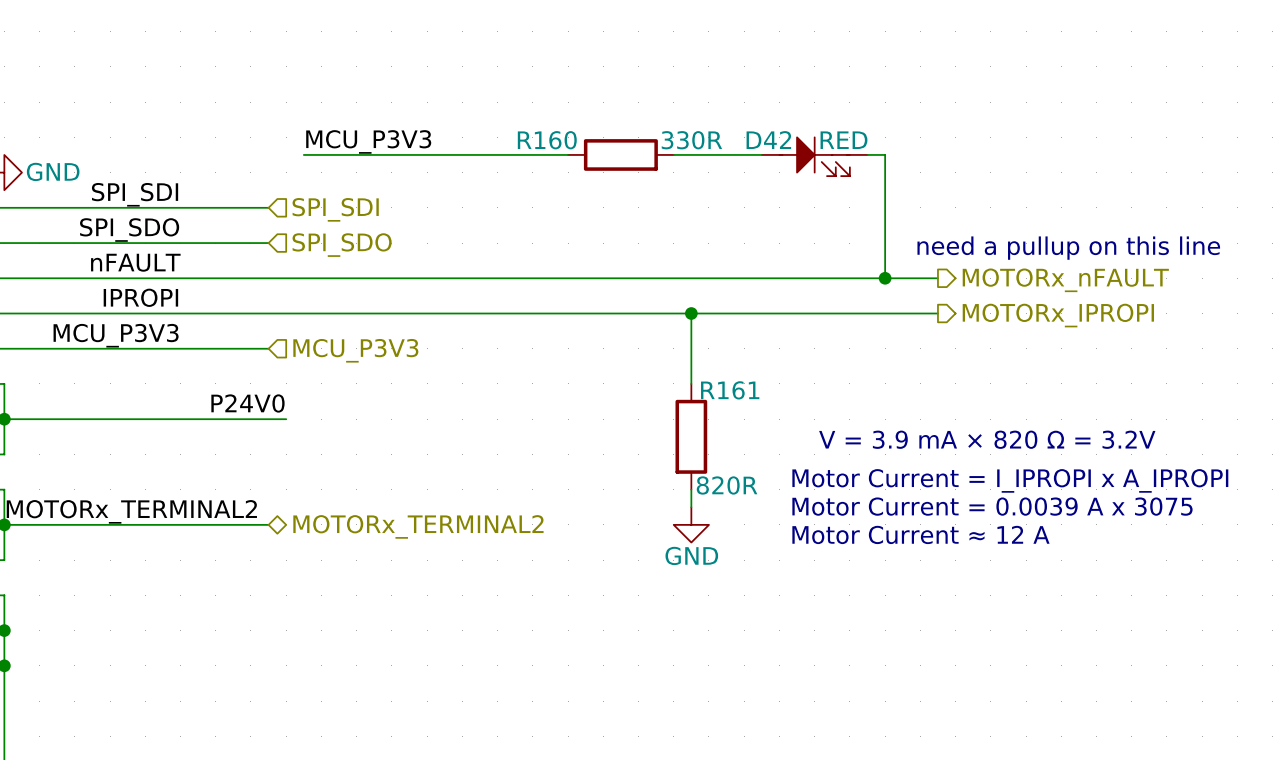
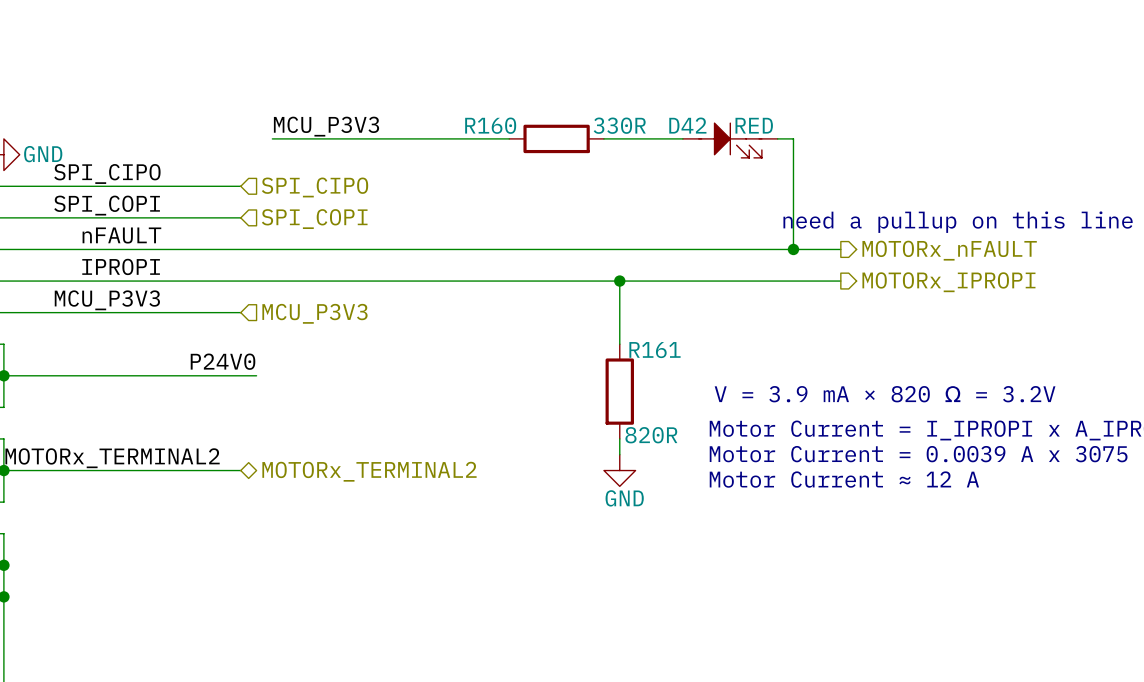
label: SPI_SDI (135, 194) -> SPI_CIPO (107, 173)
hierarchical label: SPI_SDI (335, 209) -> SPI_CIPO (315, 187)
label: SPI_SDO (129, 230) -> SPI_COPI (107, 205)
hierarchical label: SPI_SDO (342, 245) -> SPI_COPI (314, 219)

